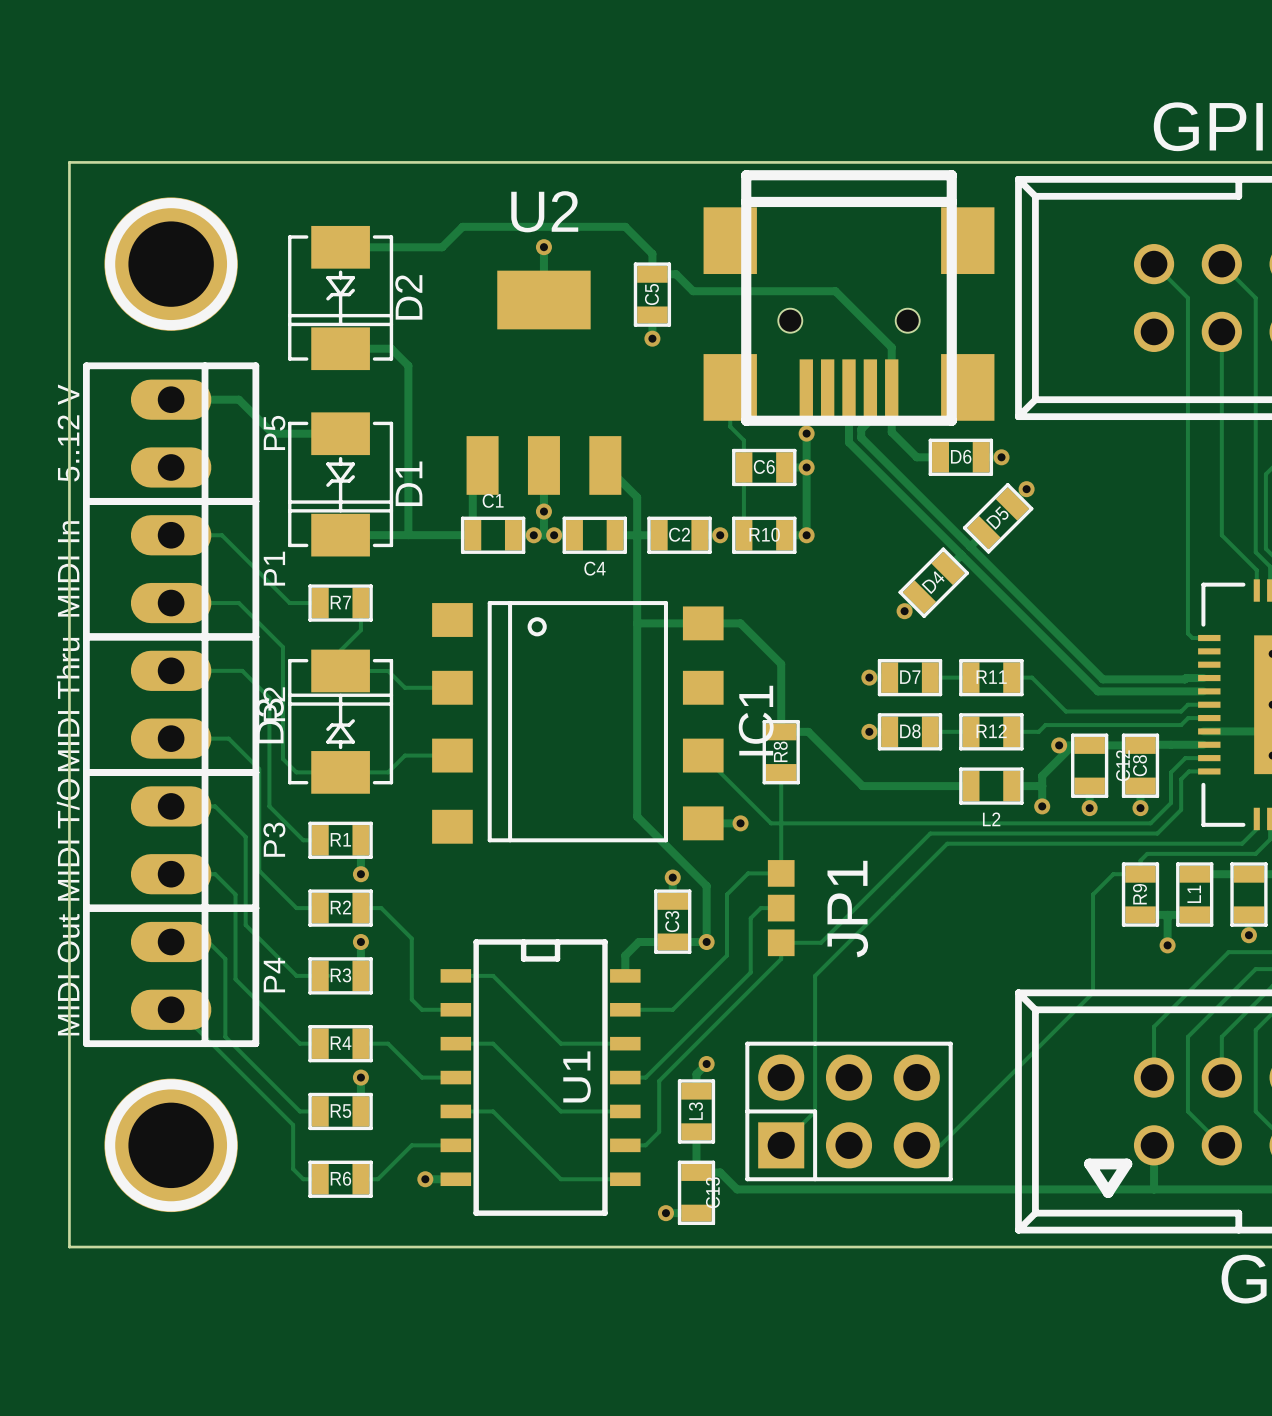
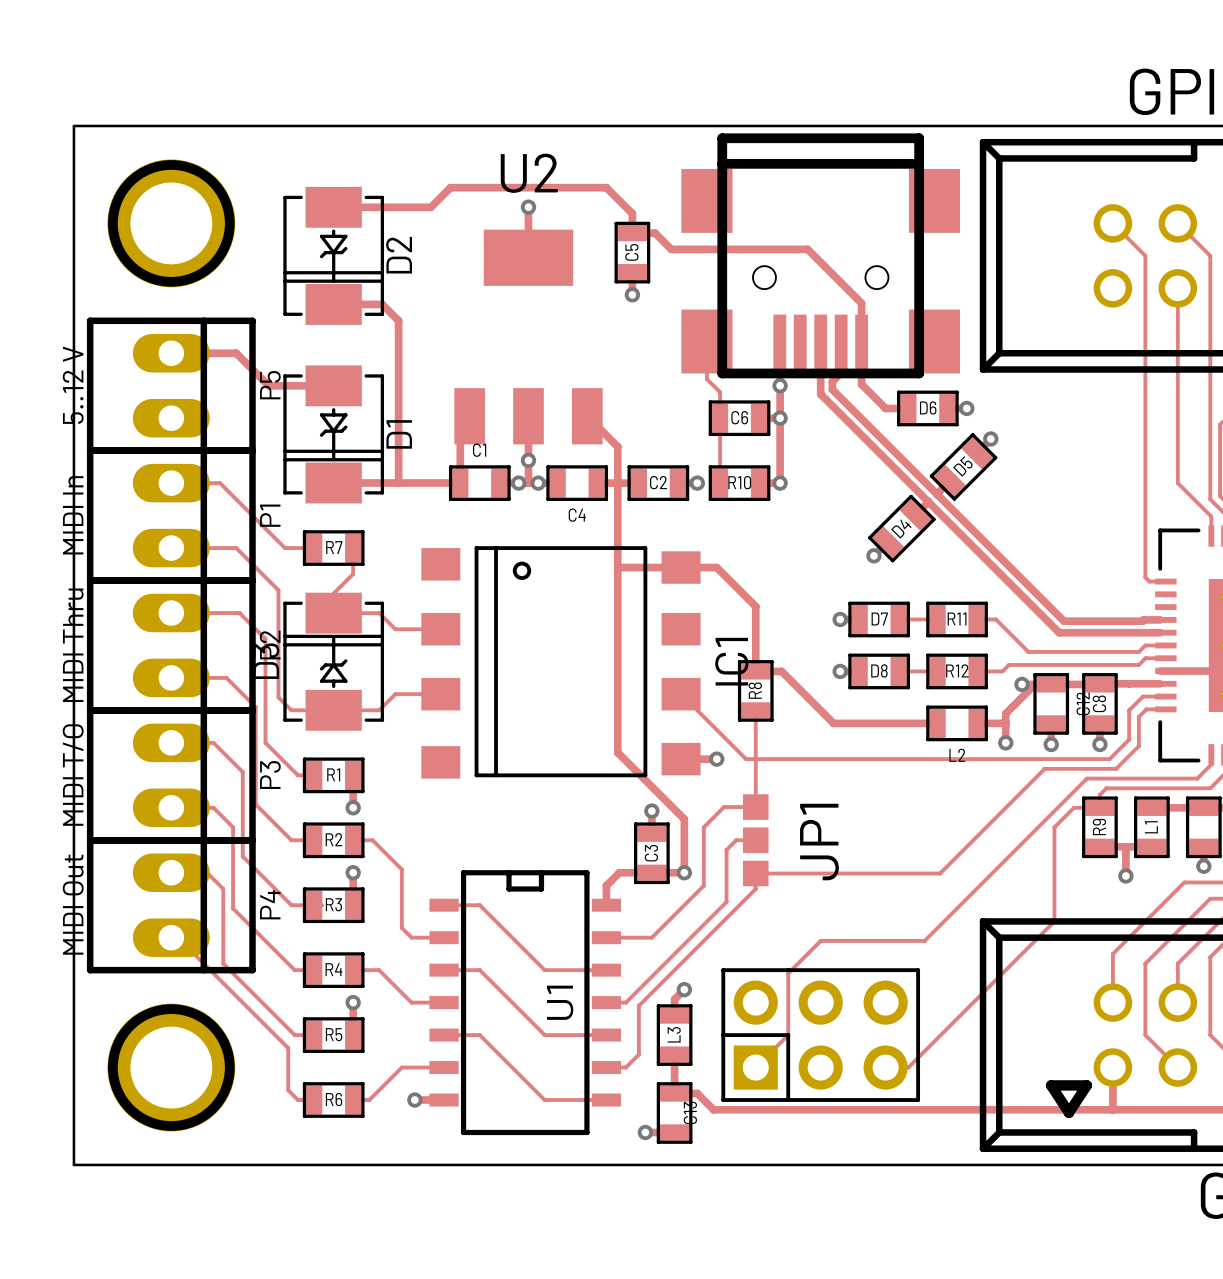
track: (1082, 833) (930, 833) (821, 942) -> (1044, 768) (940, 873) (793, 873)
track: (1126, 843) (947, 843) (815, 975) (815, 1047) -> (1086, 778) (924, 940) (820, 940) (788, 973)

